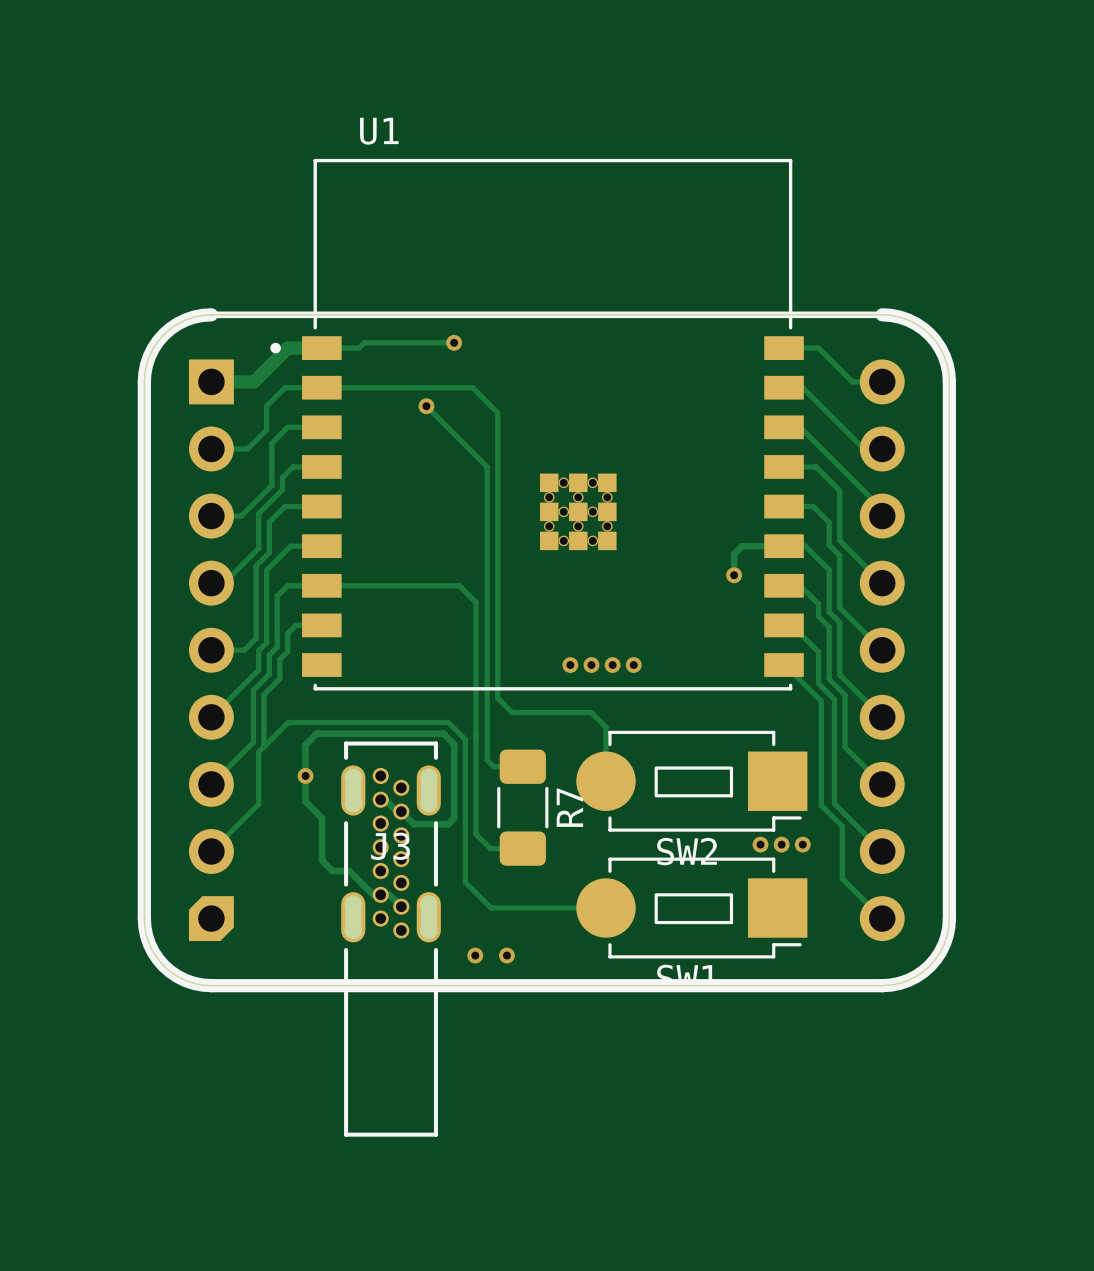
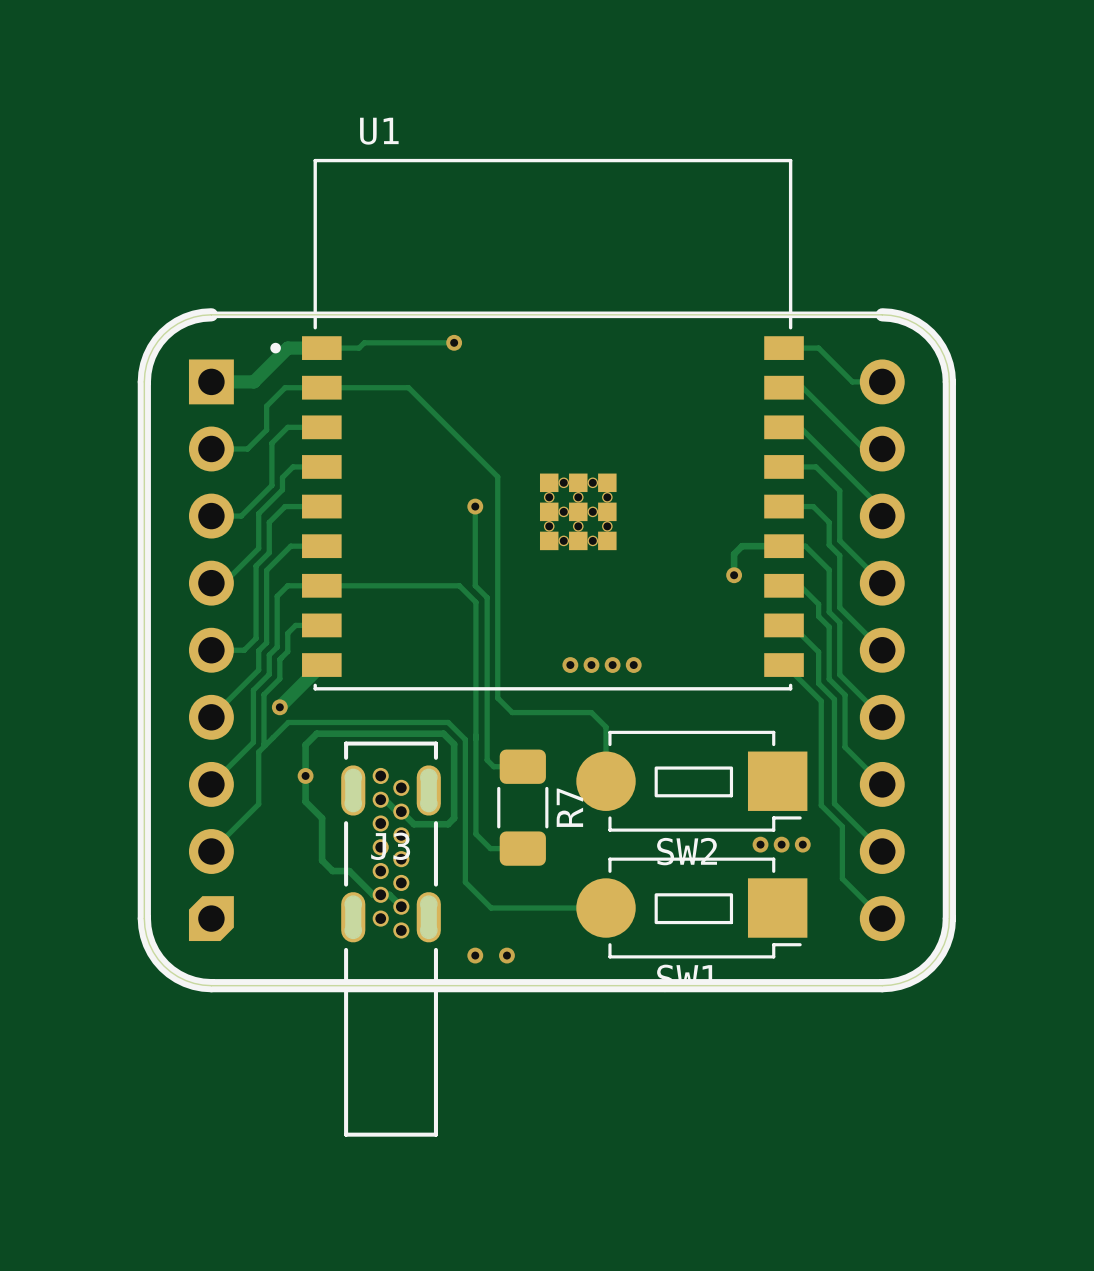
track: (408, 387) (472, 387) (497, 412) (497, 476) -> (408, 387) (497, 476)
track: (426, 406) (487, 466) (487, 597) -> (475, 506) (475, 585) (487, 597)
via position: (426, 406) -> (475, 506)
track: none -> (321, 665) (279, 707)
via: none -> (279, 707)

